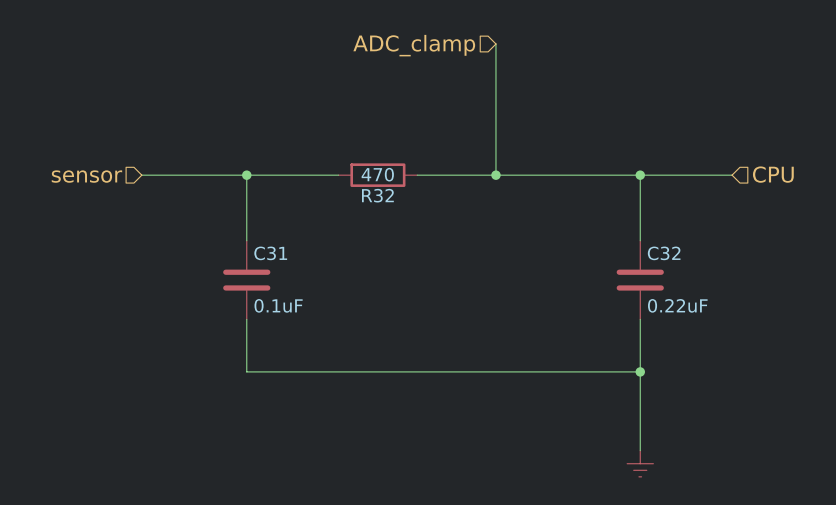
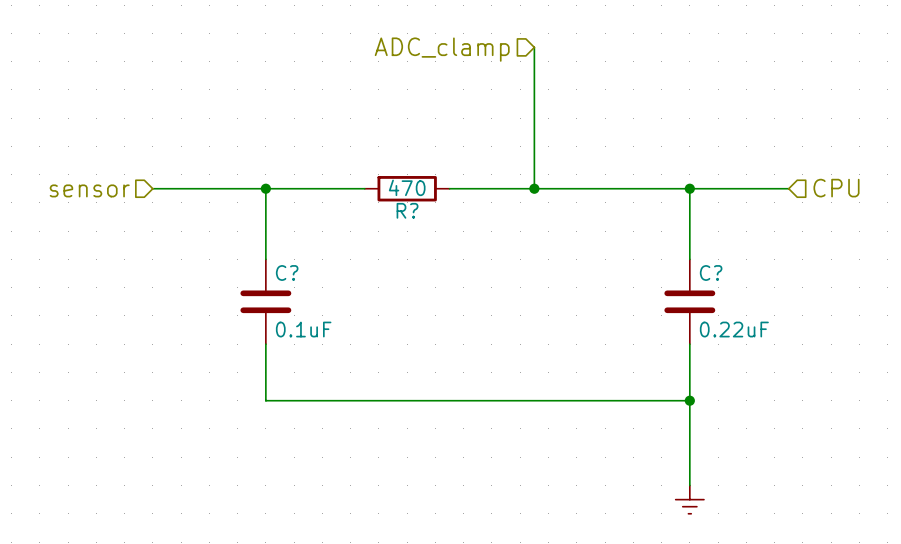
R32 name: R32 (377, 195) -> R? (407, 210)
C31 name: C31 (270, 253) -> C? (287, 273)
C32 name: C32 (664, 253) -> C? (711, 273)

